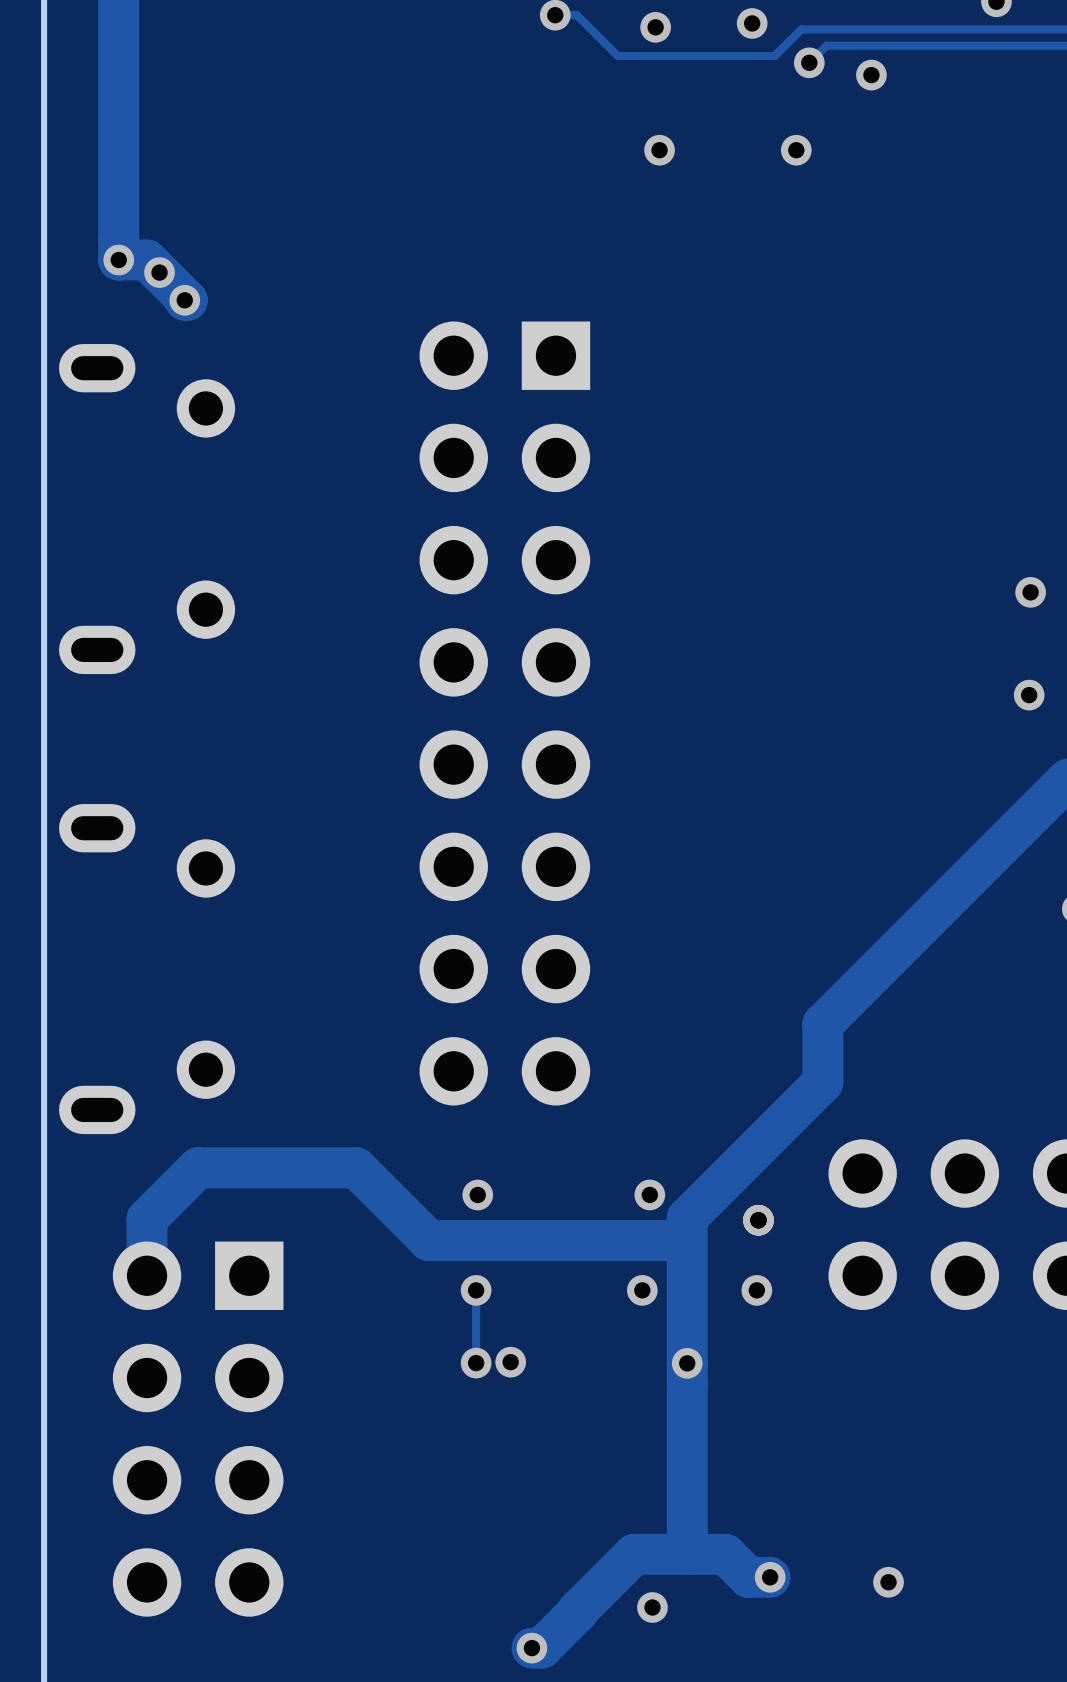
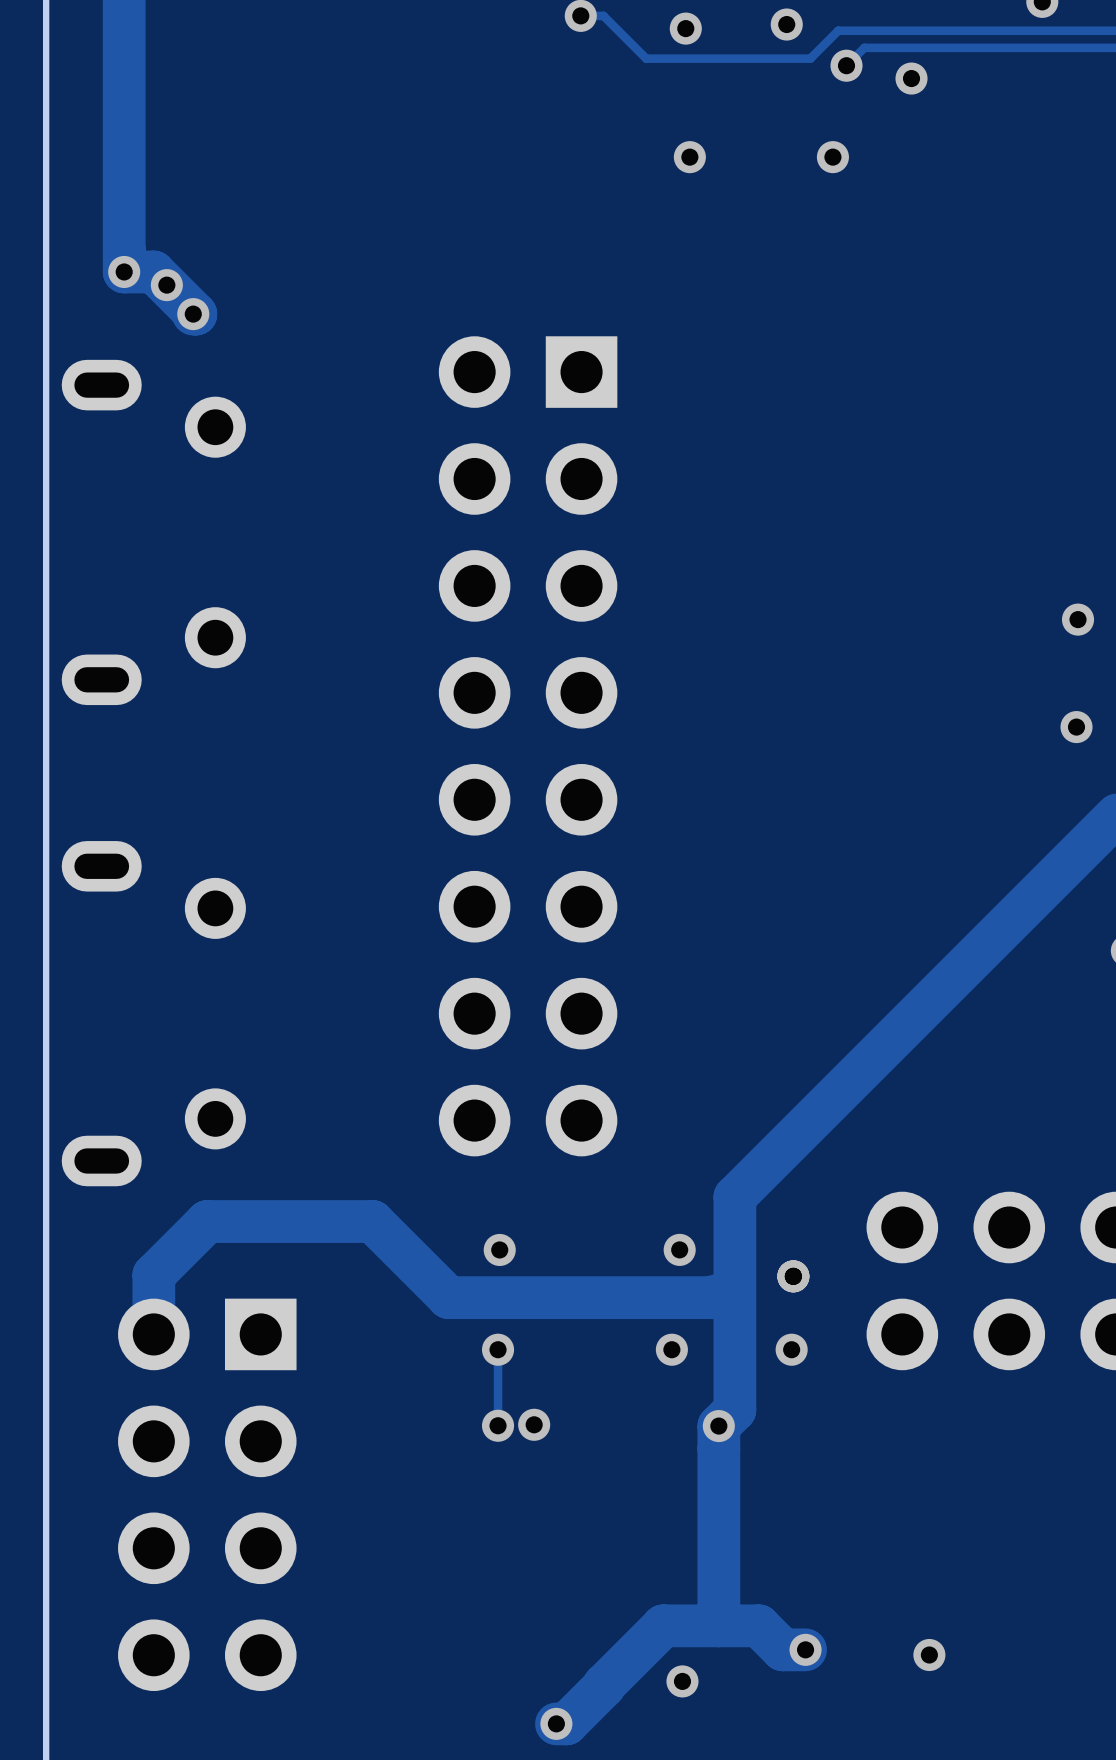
track: (822, 1024) (822, 1082) (687, 1218) (687, 1363) -> (860, 1071) (734, 1197) (734, 1410) (718, 1426)

